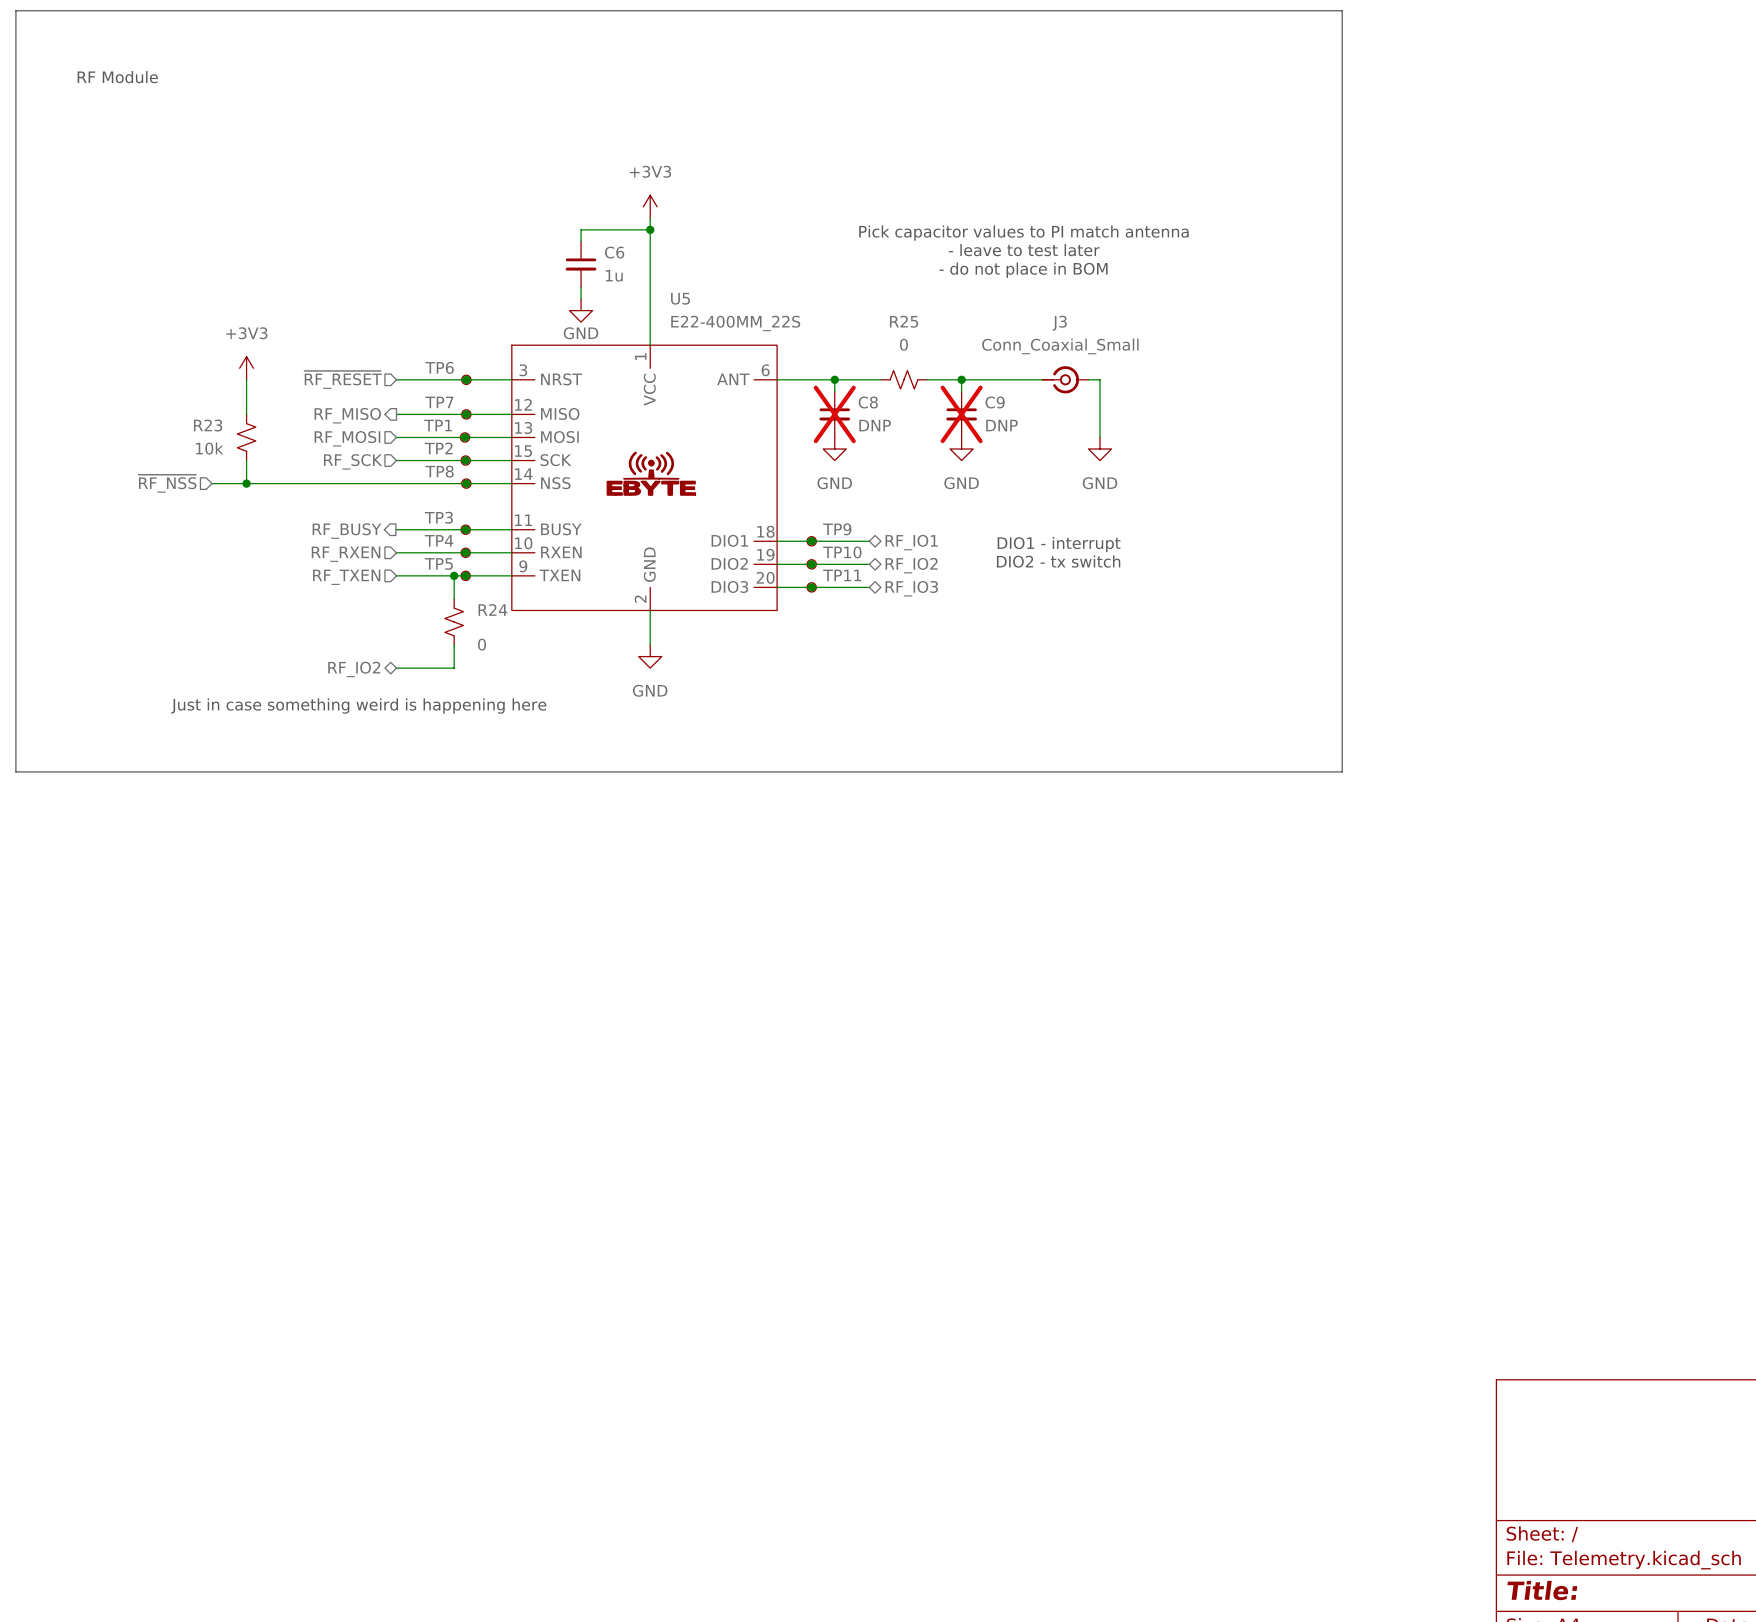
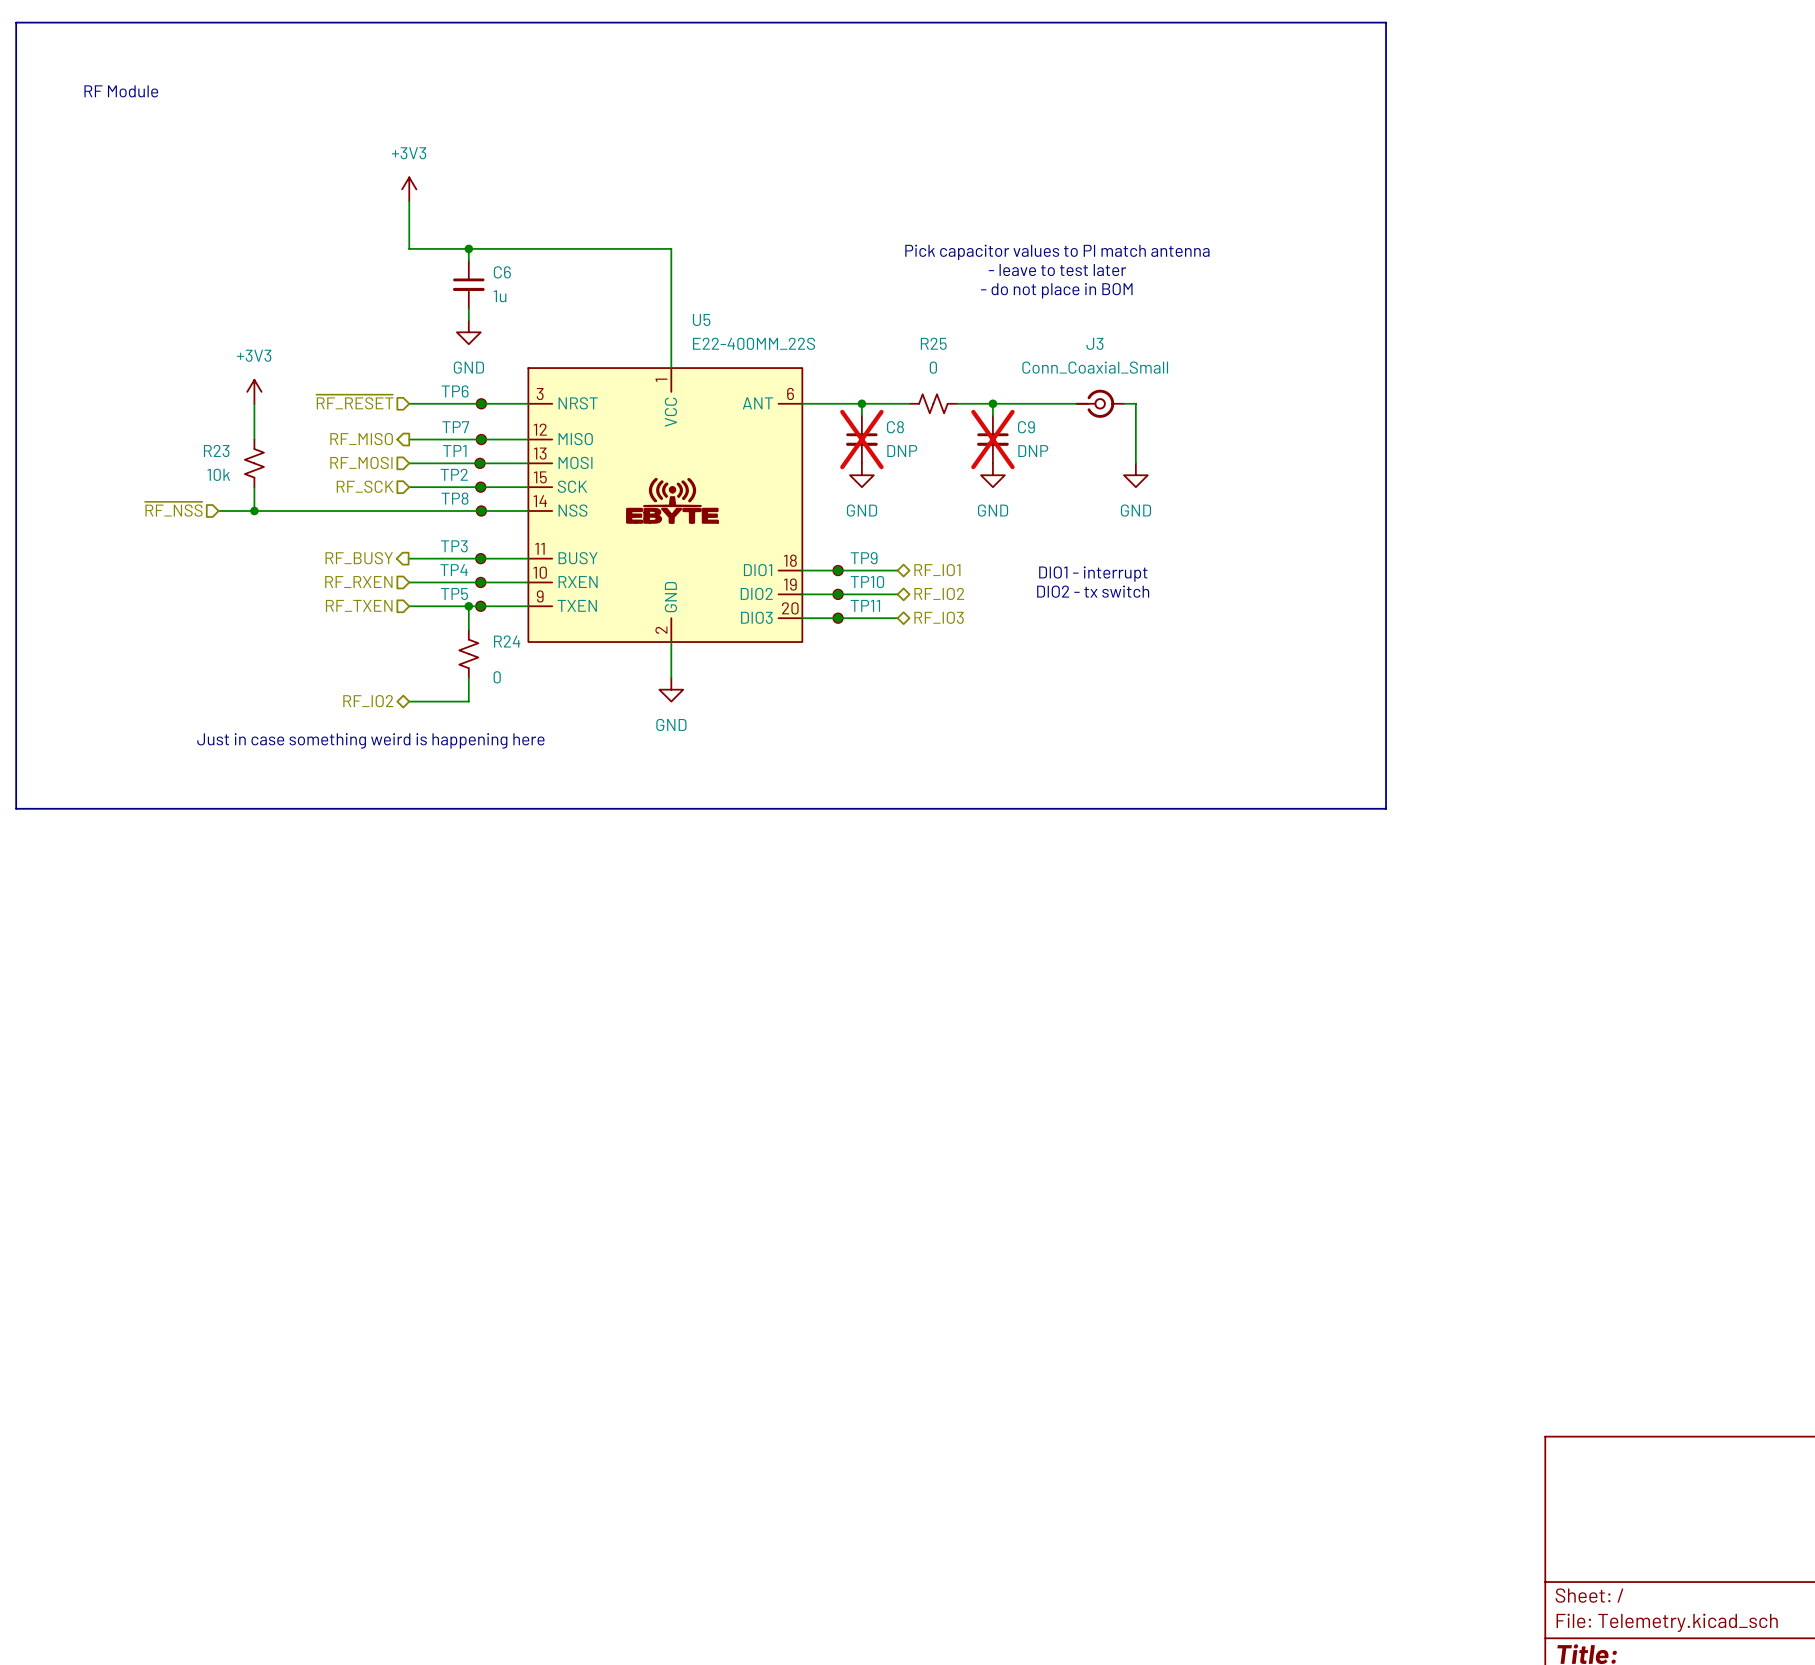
power symbol: none -> +3V3 (409, 189)
power symbol: +3V3 (650, 206) -> none
wire: (650, 218) (650, 229) -> (468, 248) (468, 260)
junction: none -> (468, 248)
wire: (581, 229) (581, 241) -> (599, 248) (409, 248) (409, 201)
junction: (650, 229) -> none
C6 position: (581, 264) -> (468, 284)
wire: (581, 287) (581, 299) -> (468, 308) (468, 320)
power symbol position: GND (581, 310) -> GND (468, 332)
power symbol text position: GND (581, 333) -> GND (468, 367)

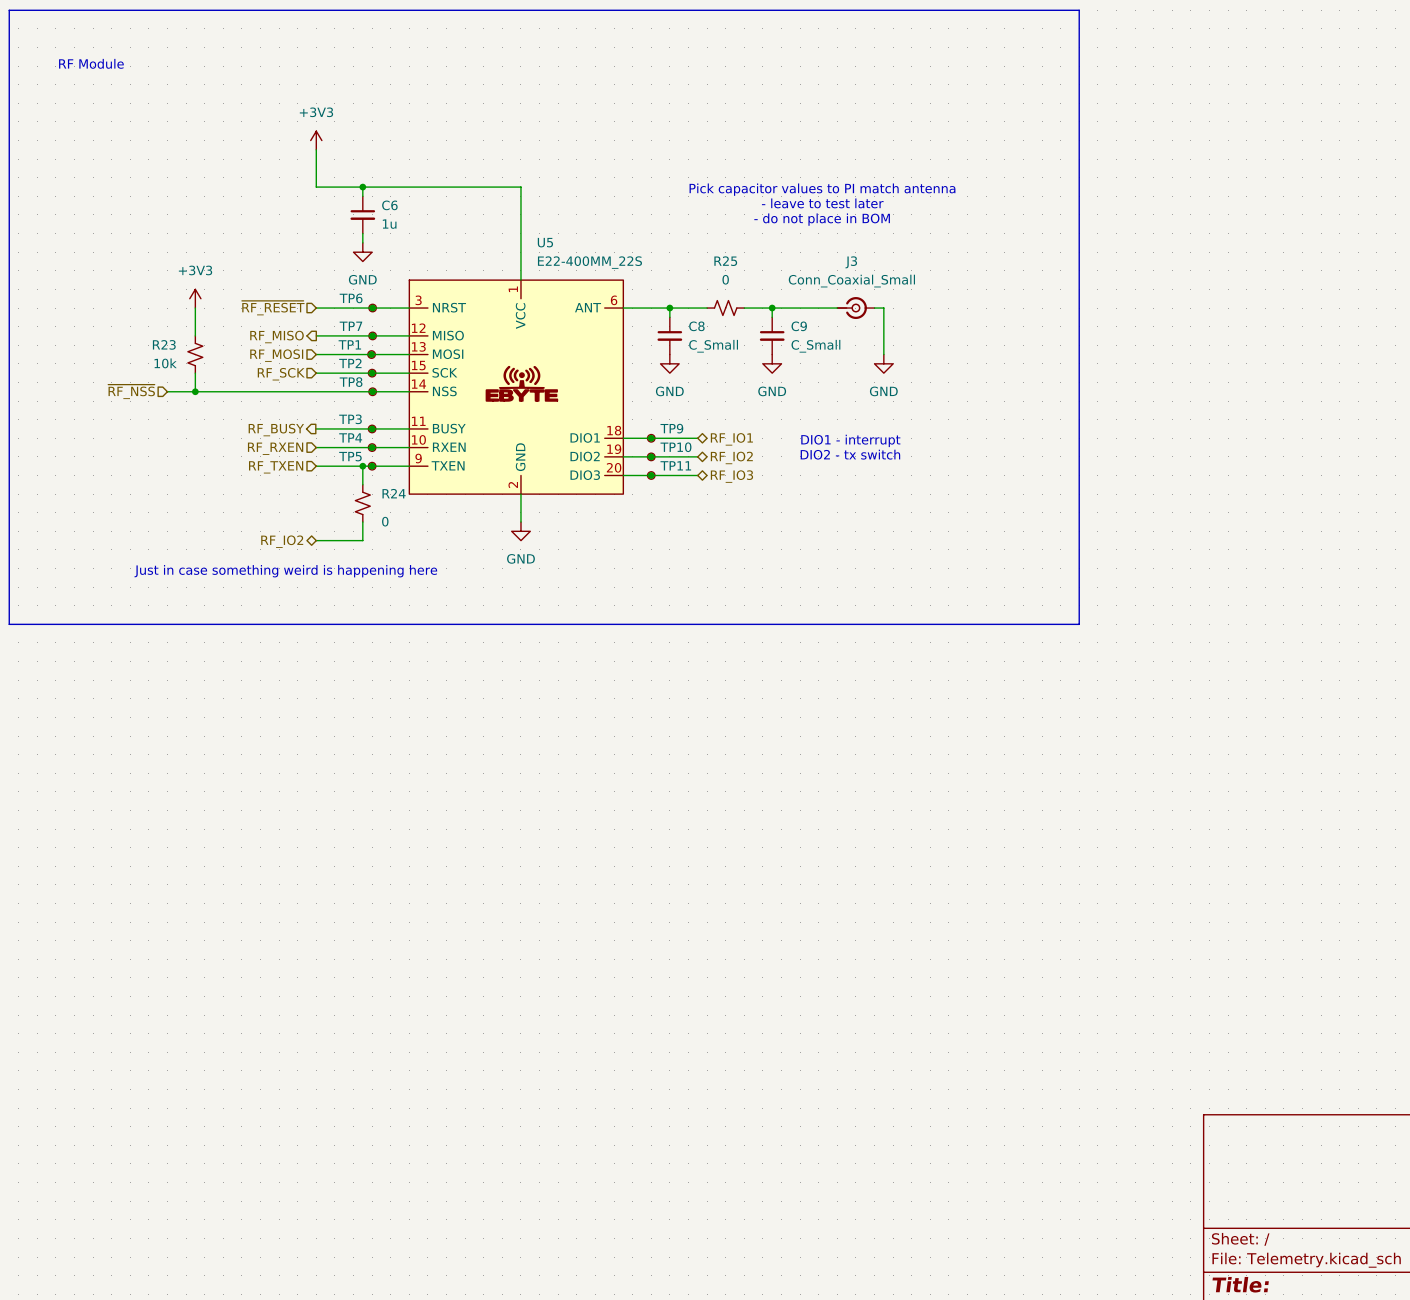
C8 do-not-place cross: (861, 439) -> none
C9 do-not-place cross: (992, 439) -> none
C8 value: DNP (902, 451) -> C_Small (713, 346)
C9 value: DNP (1033, 451) -> C_Small (815, 346)

